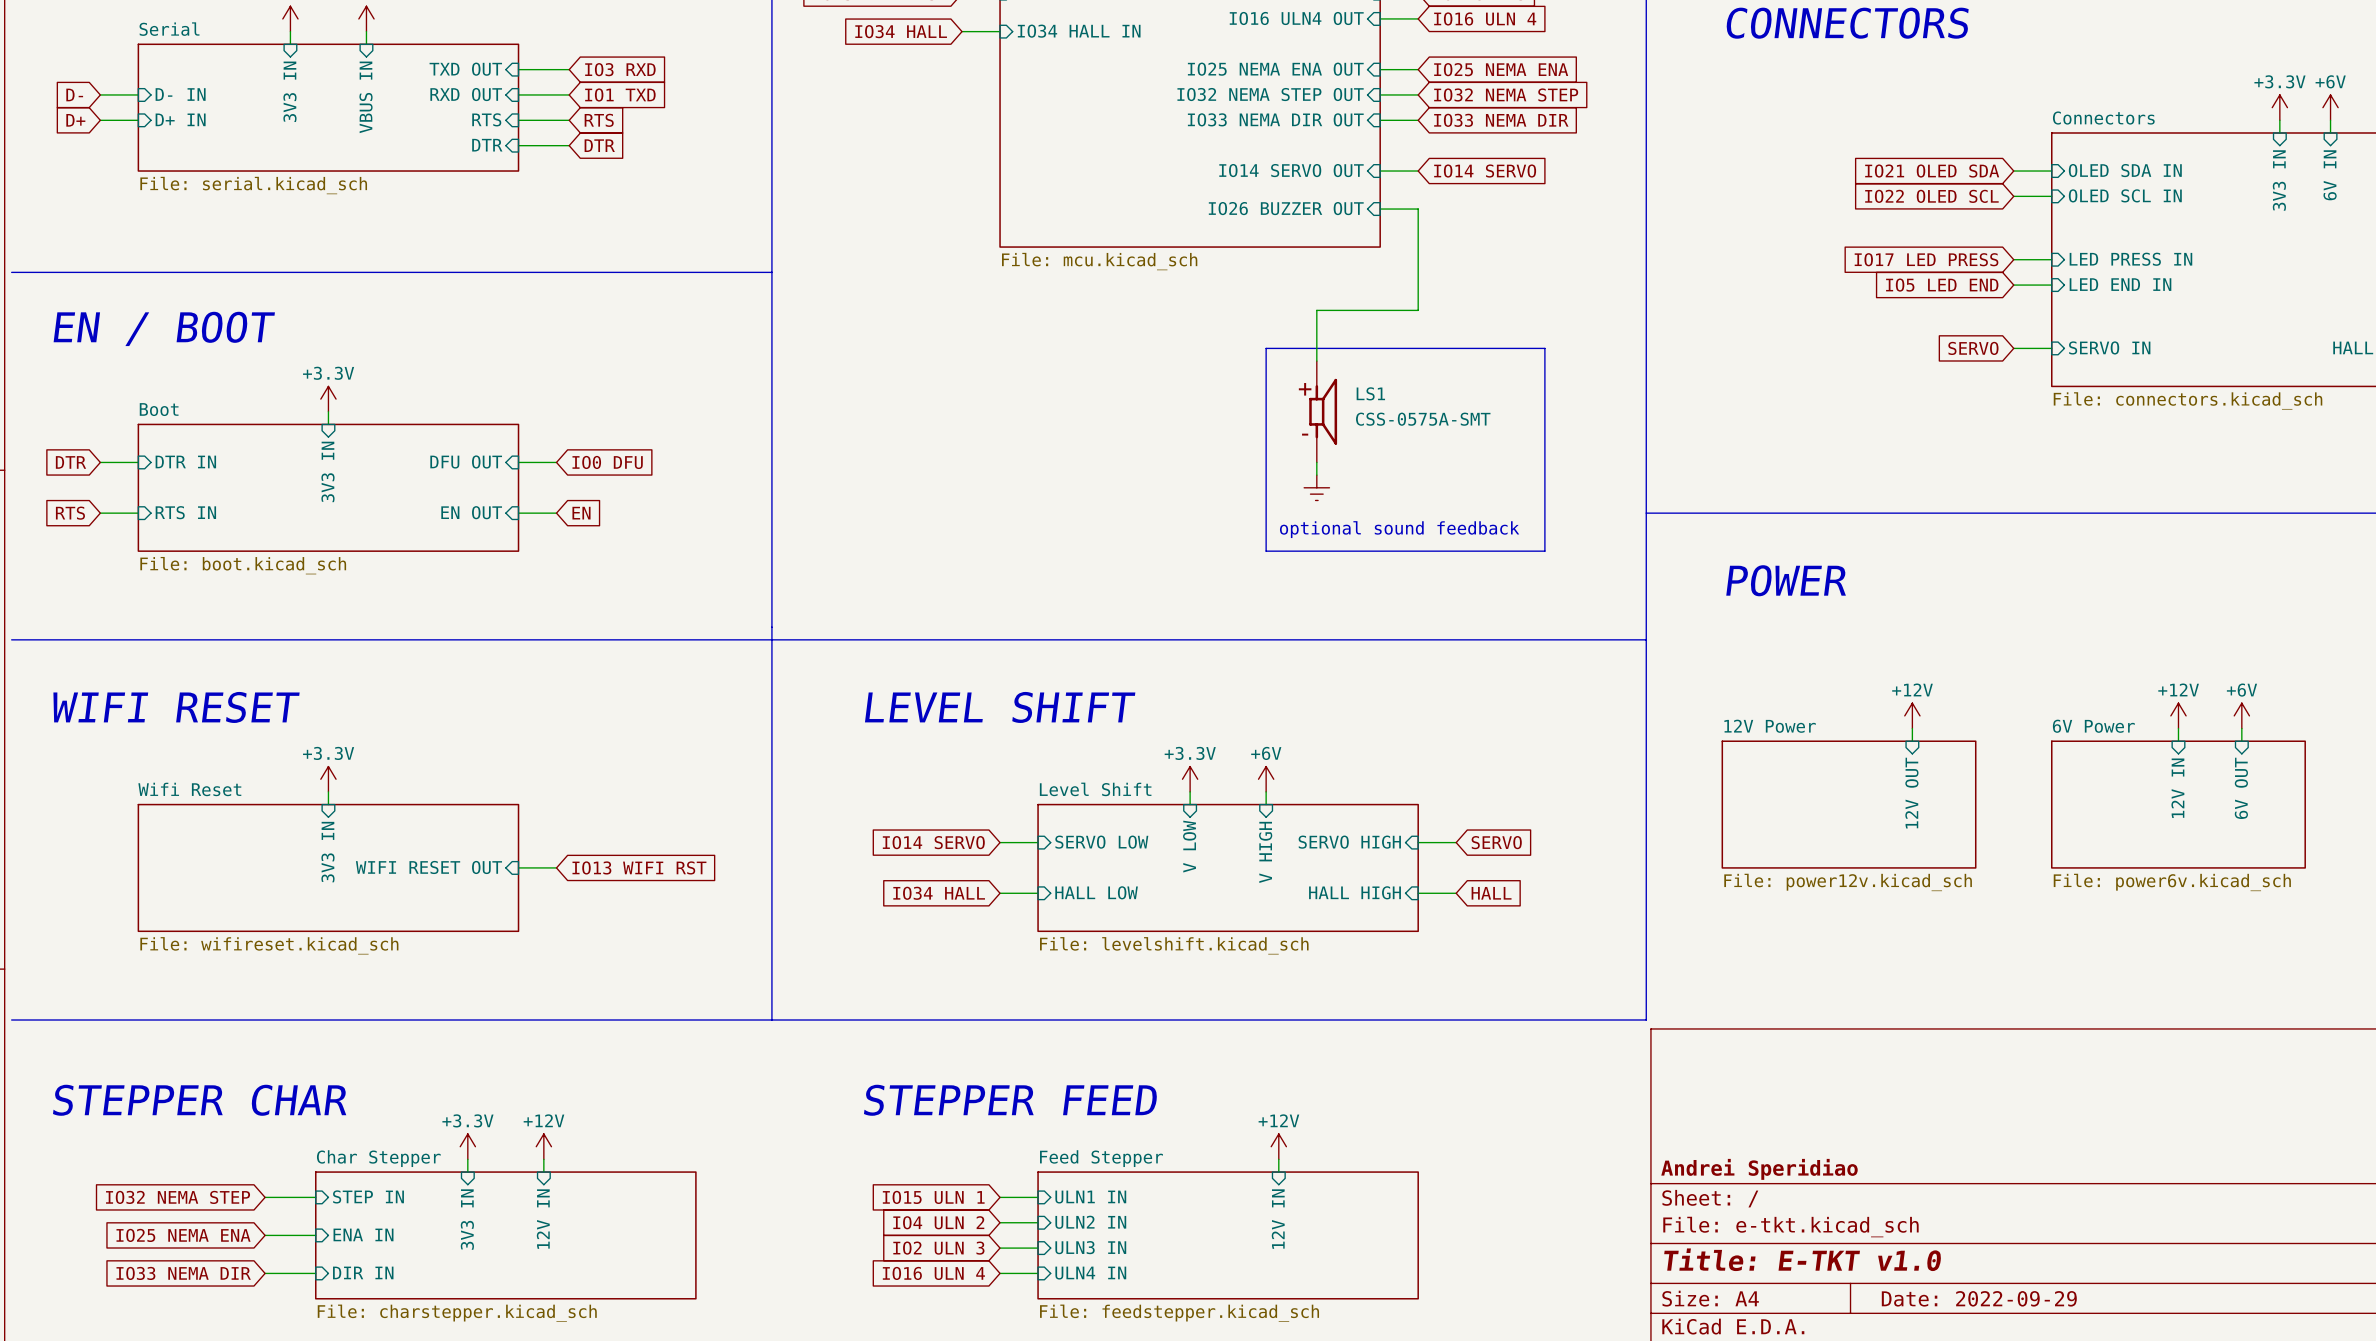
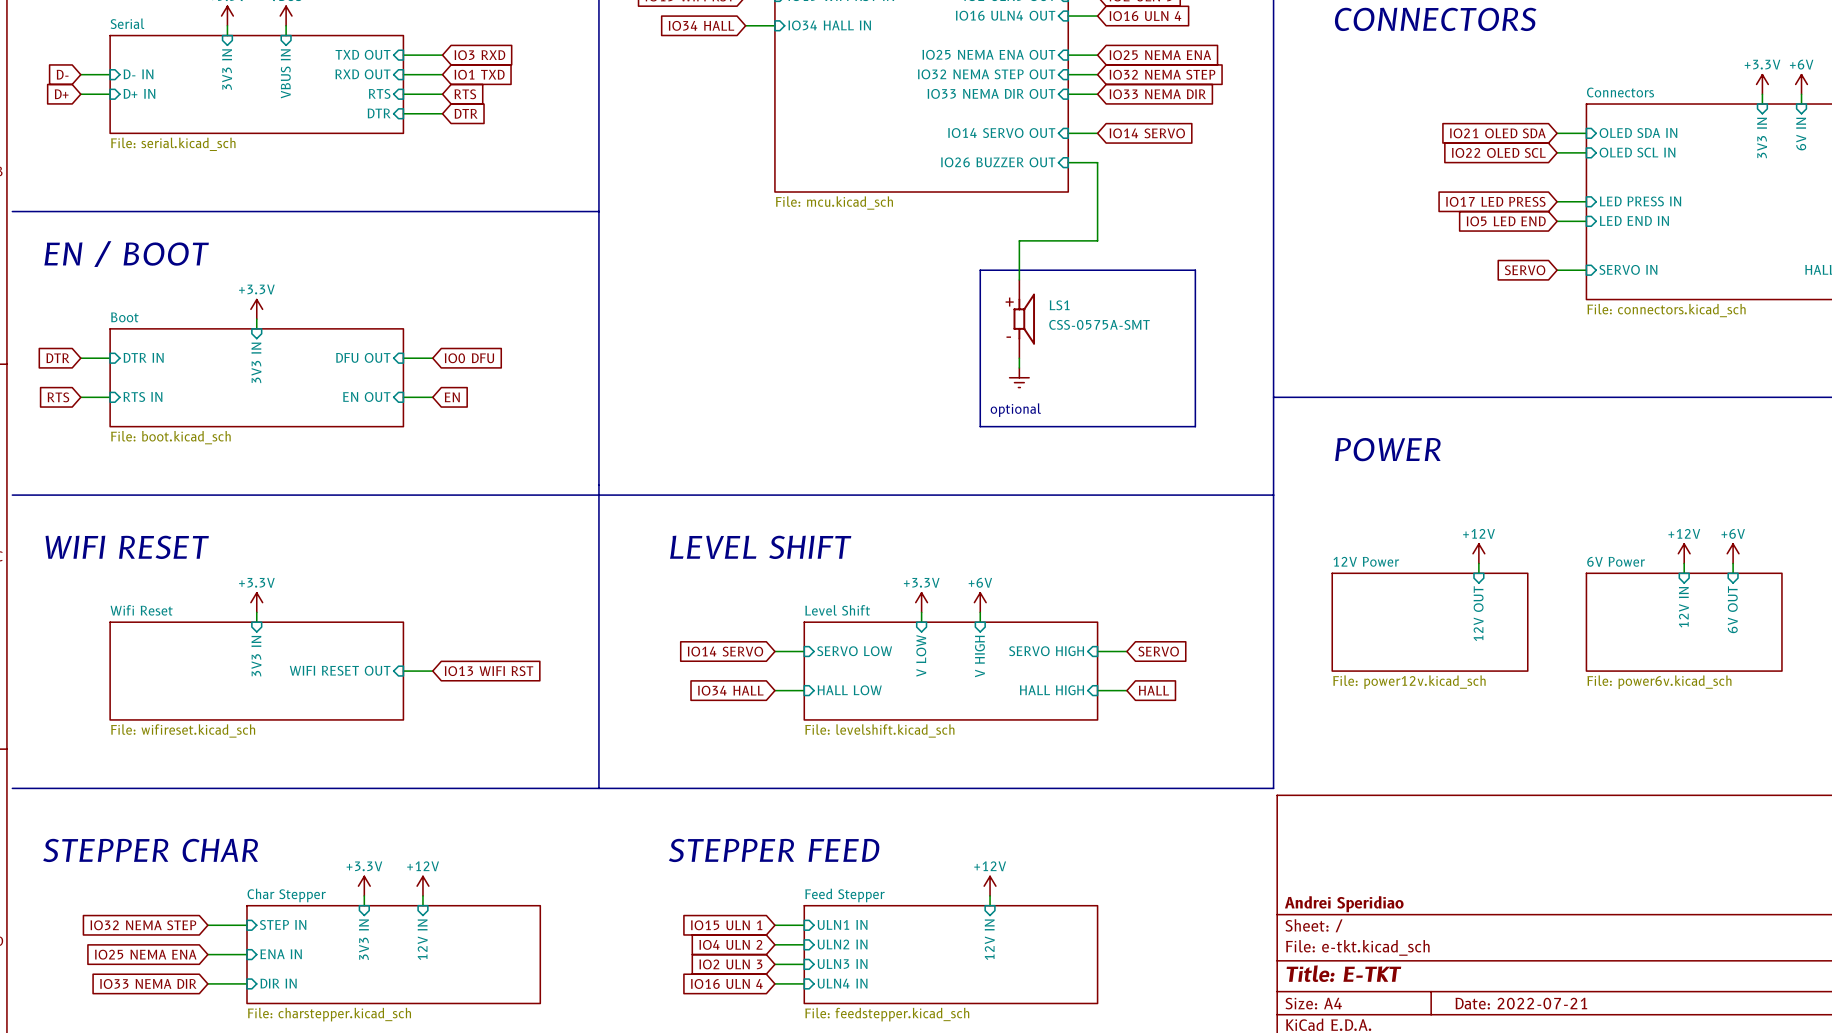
text: optional sound feedback (1399, 529) -> optional (1015, 410)
title block: Title: E-TKT v1.0 (1802, 1259) -> Title: E-TKT (1343, 973)
title block: Date: 2022-09-29 (1979, 1298) -> Date: 2022-07-21 (1521, 1003)

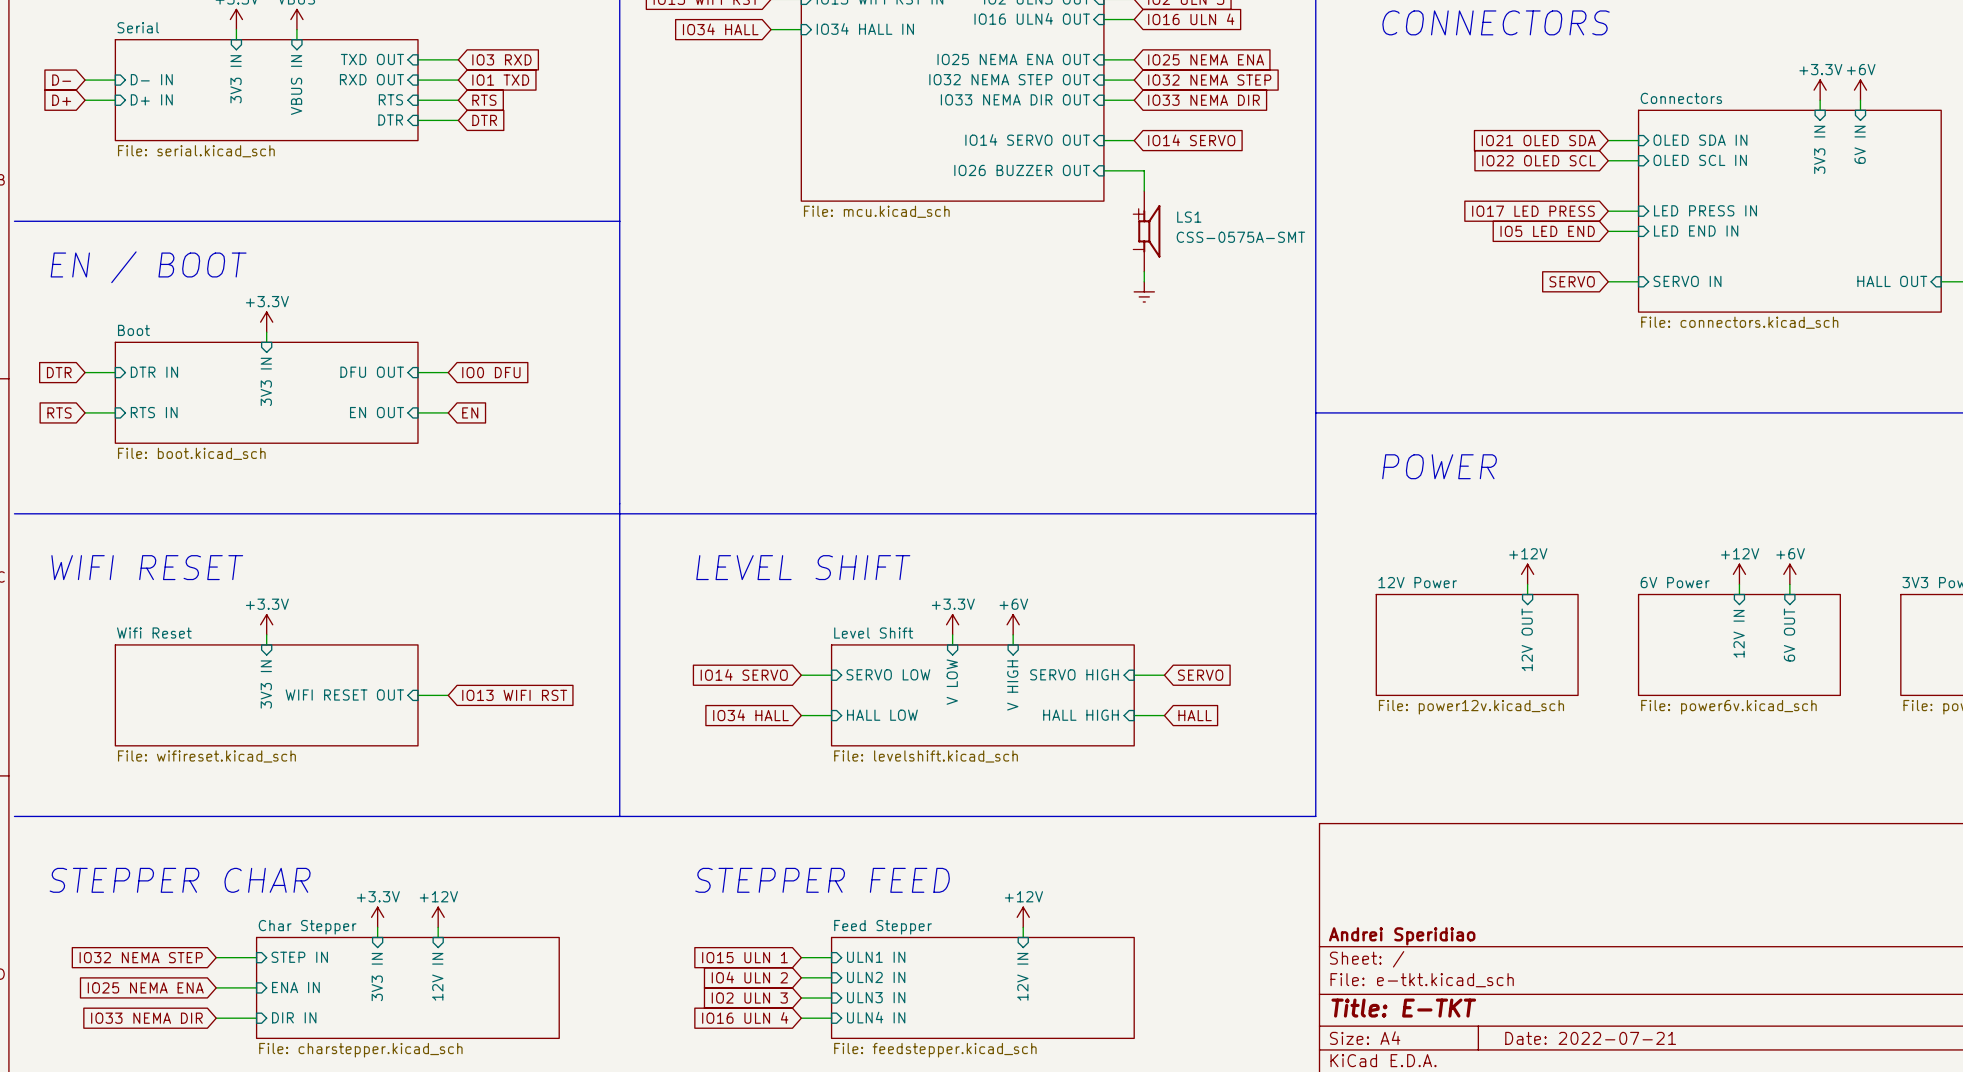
wire: (1097, 162) (1097, 240) (1019, 240) (1019, 279) -> (1134, 170) (1144, 170) (1144, 191)
line: (980, 270) (980, 426) (1195, 426) (1195, 270) (980, 270) -> none
LS1 position: (1024, 319) -> (1149, 231)
wire: (1019, 358) (1019, 367) -> (1144, 271) (1144, 281)
power symbol position: (1019, 377) -> (1144, 291)
text: optional (1015, 410) -> none

